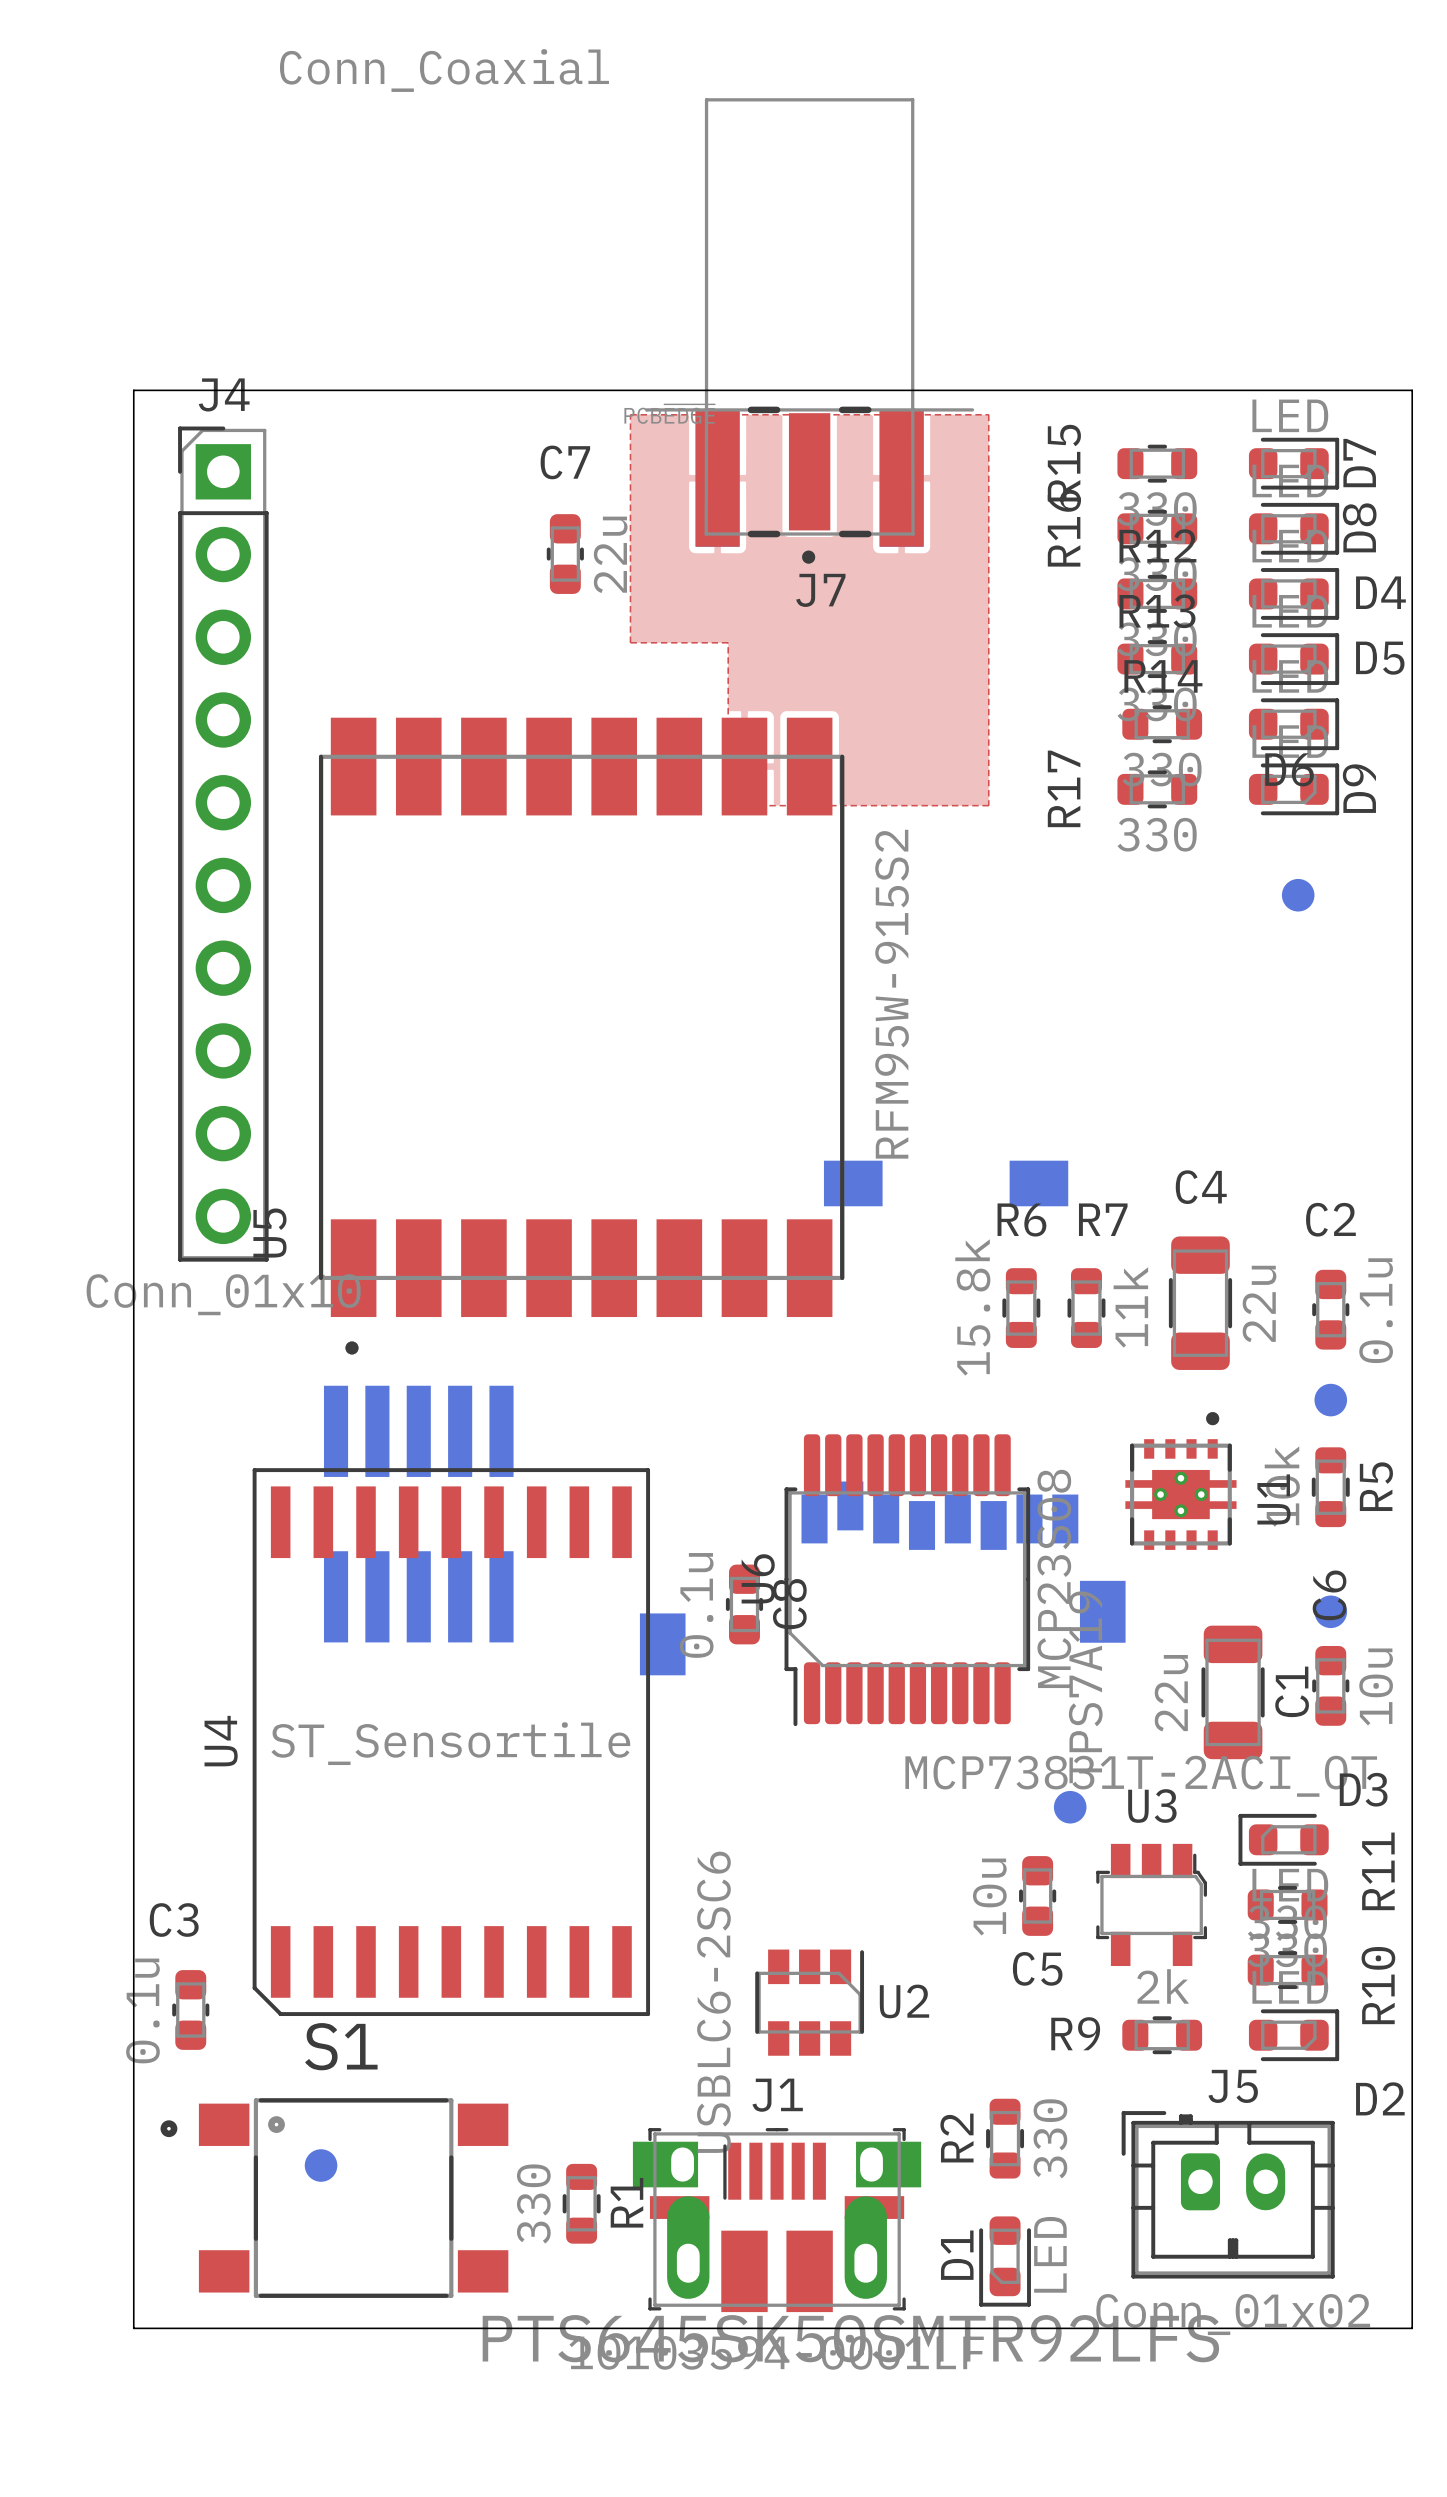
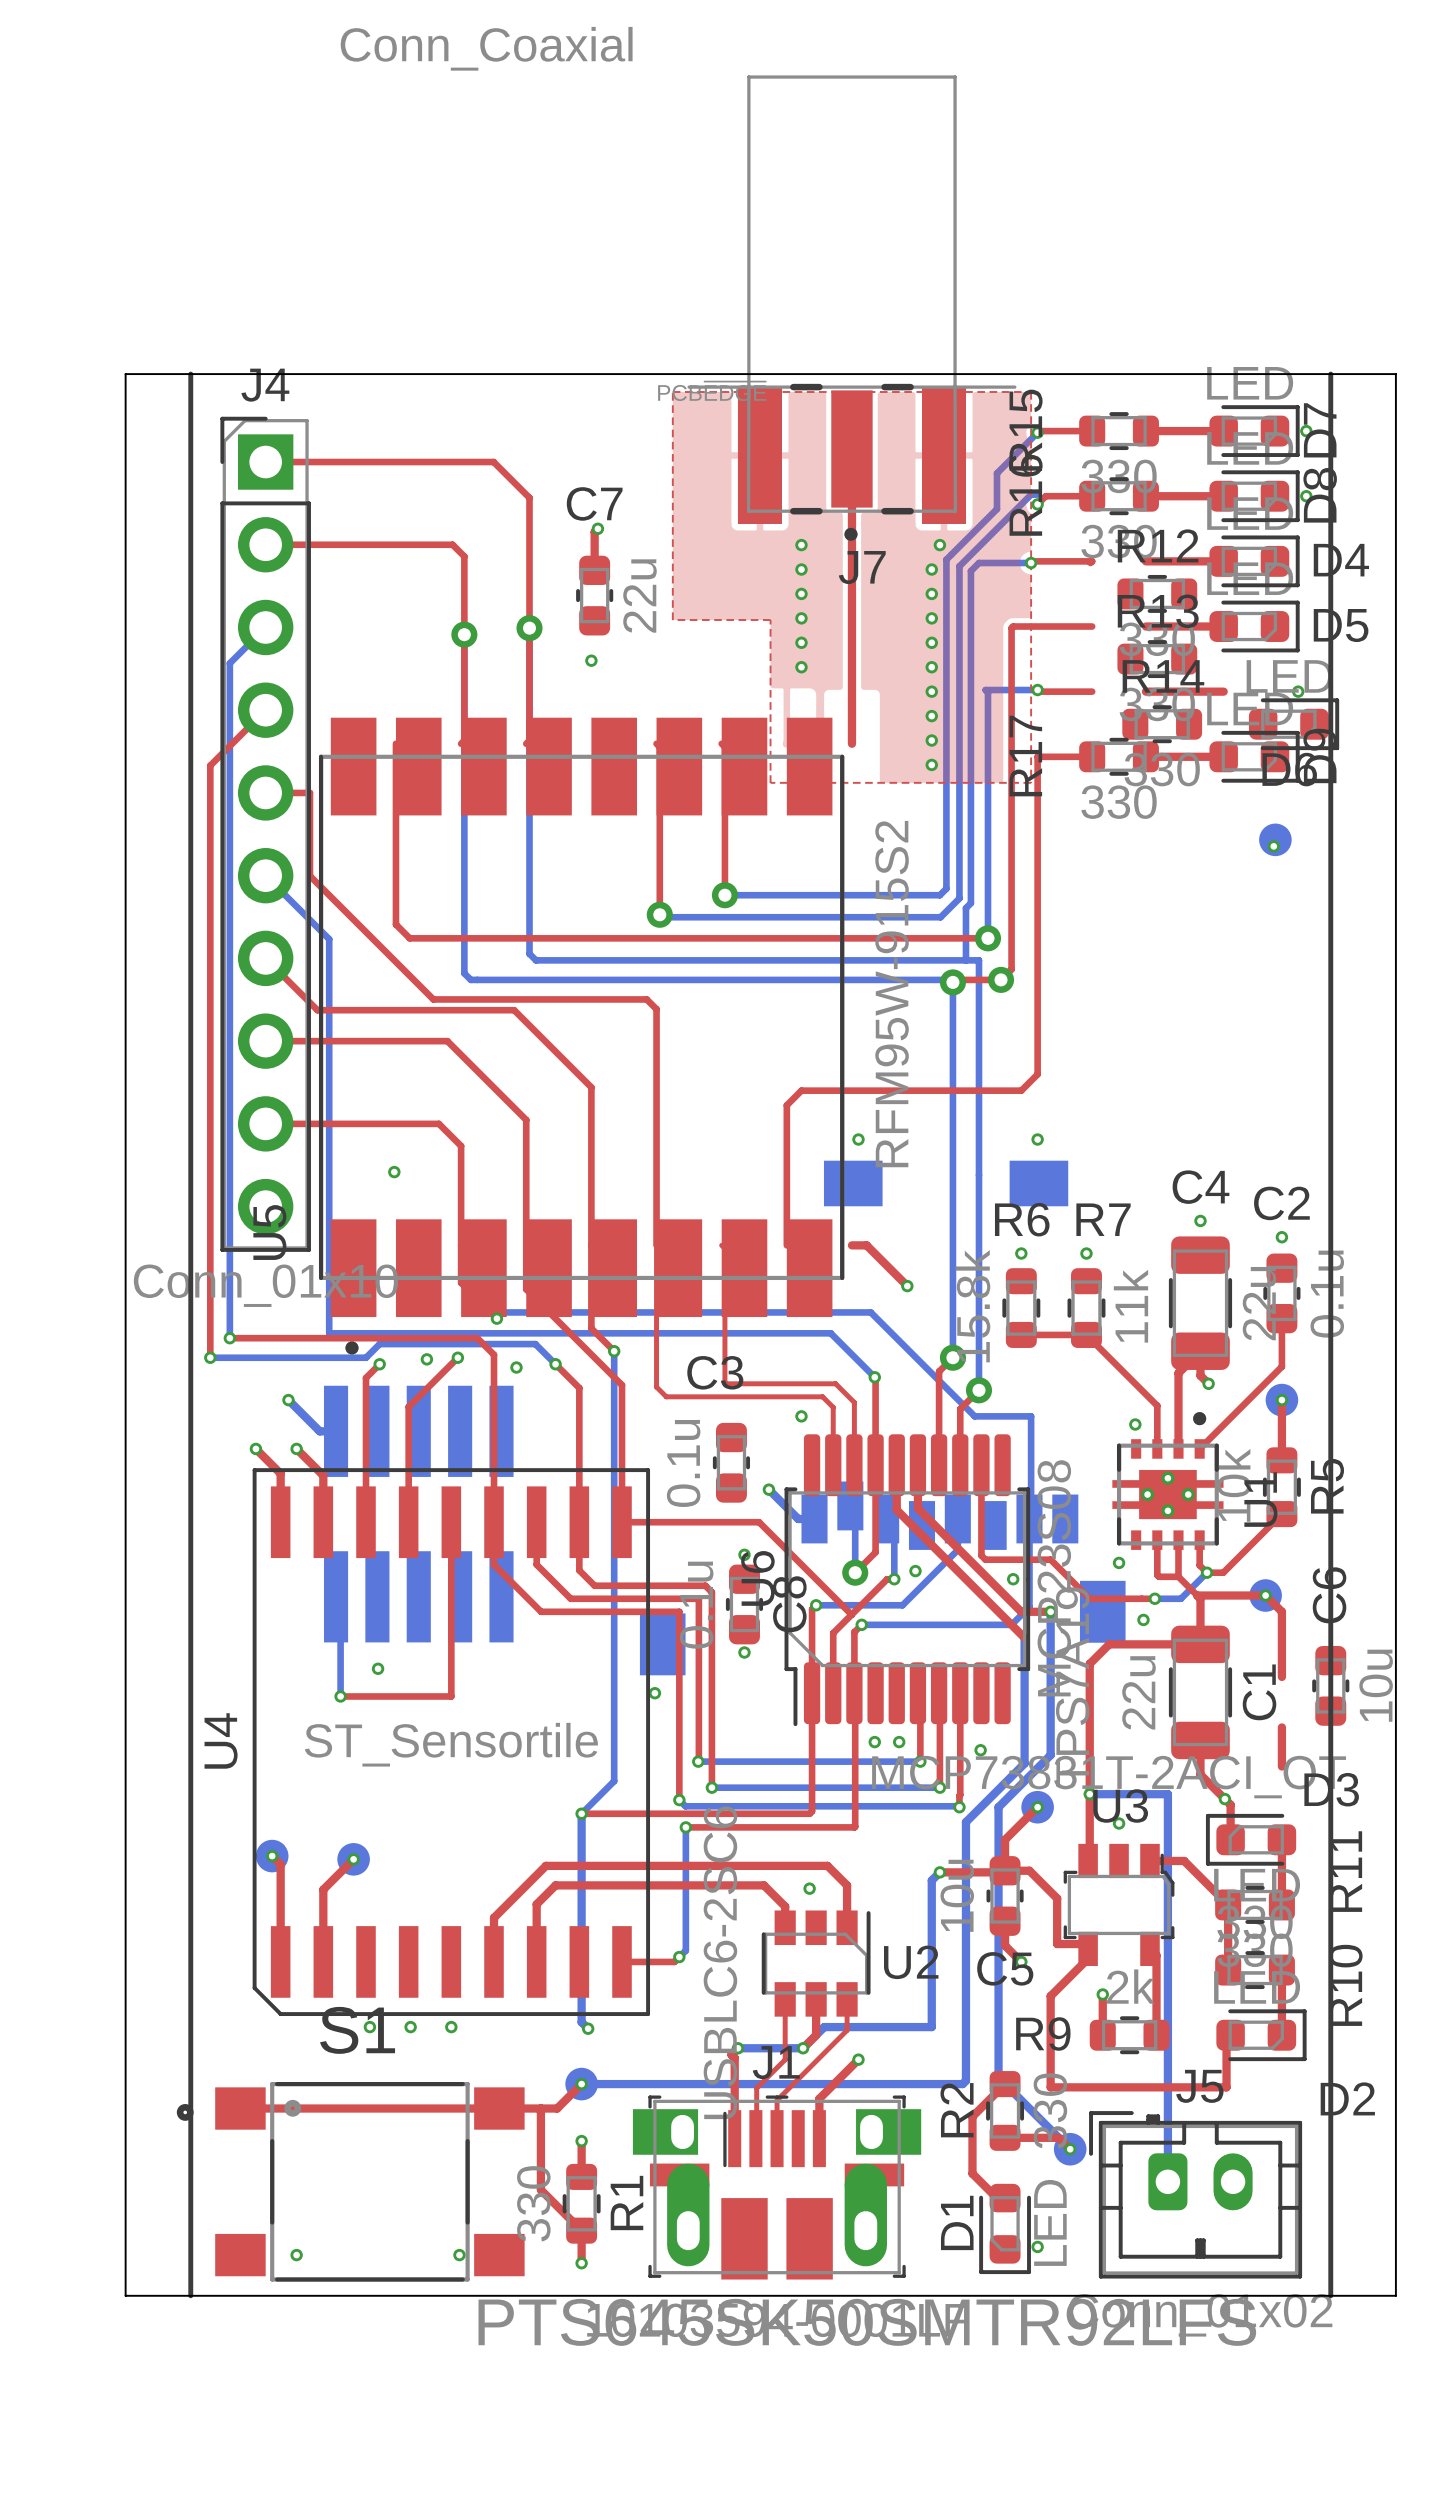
J7 position: (809, 330) -> (851, 308)
line: none -> (190, 374) (190, 2295)
line: none -> (1330, 374) (1330, 2295)
board edge: (133, 390) (133, 2328) (1412, 2328) (1412, 390) (133, 390) -> (125, 374) (125, 2295) (1395, 2295) (1395, 374) (125, 374)
top zone outline: (630, 414) (630, 642) (728, 642) (728, 805) (988, 805) (988, 414) (630, 414) -> (672, 391) (672, 619) (770, 619) (770, 782) (1031, 782) (1031, 391) (672, 391)
top track: none -> (1092, 431) (1039, 431) (1037, 432)
top track: none -> (1145, 431) (1223, 431)
via: none -> (1306, 431)
bottom track: none -> (1037, 432) (996, 473) (996, 509) (946, 559) (946, 888) (939, 895) (724, 895)
via: none -> (1037, 432)
top track: none -> (851, 448) (851, 743)
top track: none -> (265, 462) (493, 462) (529, 497) (529, 740) (526, 743)
R15 position: (1157, 463) -> (1119, 431)
D7 position: (1294, 463) -> (1254, 431)
bottom track: none -> (1037, 494) (1031, 494) (959, 566) (959, 898) (940, 917) (662, 917) (659, 914)
top track: none -> (1092, 496) (1045, 496) (1037, 504)
top track: none -> (1145, 496) (1223, 496)
via: none -> (1306, 496)
via: none -> (1037, 504)
top track: none -> (597, 528) (594, 532) (594, 570)
via: none -> (597, 528)
R16 position: (1157, 528) -> (1119, 496)
D8 position: (1294, 528) -> (1254, 496)
top track: none -> (265, 544) (452, 544) (464, 556) (464, 740) (461, 743)
via: none -> (801, 545)
via: none -> (939, 545)
C7 position: (565, 554) -> (594, 595)
top track: none -> (1145, 561) (1223, 561)
top track: none -> (1031, 562) (1032, 561) (1092, 561) (1090, 562)
bottom track: none -> (1031, 562) (978, 562) (970, 571) (970, 903) (965, 908) (965, 960)
via: none -> (1031, 562)
via: none -> (801, 569)
via: none -> (931, 569)
via: none -> (801, 593)
via: none -> (931, 593)
D4 position: (1294, 593) -> (1254, 561)
via: none -> (801, 618)
via: none -> (931, 618)
top track: none -> (1092, 626) (1013, 626) (1011, 628) (1011, 969) (1001, 979) (955, 979) (952, 982)
top track: none -> (1145, 626) (1223, 626)
bottom track: none -> (265, 627) (229, 663) (229, 1338)
bottom track: none -> (529, 628) (529, 953) (536, 960) (978, 960) (978, 1390)
via: none -> (529, 628)
bottom track: none -> (464, 634) (464, 973) (470, 979) (952, 979) (952, 1357)
via: none -> (464, 634)
via: none -> (801, 642)
via: none -> (931, 642)
D5 position: (1294, 659) -> (1254, 626)
via: none -> (591, 660)
via: none -> (801, 667)
via: none -> (931, 667)
top track: none -> (1037, 690) (1039, 691) (1092, 691)
bottom track: none -> (1037, 690) (985, 690) (987, 692) (987, 938)
via: none -> (1037, 690)
via: none -> (931, 691)
top track: none -> (1145, 691) (1223, 691)
via: none -> (1298, 691)
top track: none -> (265, 710) (210, 765) (210, 1357)
via: none -> (931, 716)
via: none -> (931, 740)
top track: none -> (395, 743) (395, 924) (409, 938) (987, 938)
top track: none -> (656, 743) (659, 747) (659, 914)
top track: none -> (721, 743) (724, 747) (724, 895)
top track: none -> (1092, 756) (1037, 756) (1037, 1074) (1021, 1090) (801, 1090) (786, 1105) (786, 1245)
top track: none -> (1145, 756) (1223, 756)
via: none -> (931, 764)
R17 position: (1157, 789) -> (1119, 756)
D9 position: (1294, 789) -> (1254, 756)
top track: none -> (265, 792) (309, 792) (309, 876) (433, 999) (646, 999) (656, 1009) (656, 1387) (666, 1396) (822, 1396) (833, 1407) (833, 1465)
J4 position: (223, 844) -> (265, 834)
via: none -> (1273, 846)
bottom track: none -> (265, 875) (329, 939) (329, 1333) (830, 1333) (874, 1377)
via: none -> (724, 895)
part position: (1298, 895) -> (1275, 839)
via: none -> (659, 914)
via: none -> (987, 938)
top track: none -> (265, 958) (317, 1010) (514, 1010) (591, 1087) (591, 1328) (614, 1351)
via: none -> (1001, 979)
via: none -> (952, 982)
top track: none -> (265, 1041) (447, 1041) (526, 1119) (526, 1289) (622, 1385) (622, 1522) (759, 1522) (851, 1614)
top track: none -> (265, 1123) (438, 1123) (461, 1146) (461, 1282) (496, 1318)
via: none -> (858, 1139)
via: none -> (1037, 1139)
via: none -> (394, 1172)
via: none -> (1200, 1220)
via: none -> (1281, 1237)
top track: none -> (721, 1245) (724, 1248) (724, 1383) (835, 1383) (854, 1402) (854, 1465)
top track: none -> (851, 1245) (866, 1245) (907, 1286)
via: none -> (1021, 1253)
via: none -> (1086, 1253)
via: none -> (907, 1286)
C2 position: (1330, 1309) -> (1281, 1293)
bottom track: none -> (496, 1318) (503, 1312) (870, 1312) (974, 1416) (1031, 1416) (1029, 1606) (1011, 1624) (861, 1624)
via: none -> (496, 1318)
top track: none -> (1281, 1318) (1281, 1366) (1199, 1448)
top track: none -> (1021, 1334) (1086, 1334) (1157, 1405) (1157, 1448)
top track: none -> (229, 1338) (477, 1338) (494, 1354) (494, 1564) (541, 1611) (679, 1611) (679, 1800)
via: none -> (229, 1338)
bottom track: none -> (614, 1351) (614, 1781) (581, 1813) (581, 2022) (588, 2028)
via: none -> (614, 1351)
bottom track: none -> (210, 1357) (366, 1357) (379, 1344) (535, 1344) (555, 1364)
via: none -> (210, 1357)
top track: none -> (457, 1357) (408, 1406) (408, 1522)
via: none -> (457, 1357)
top track: none -> (952, 1357) (939, 1371) (939, 1465)
via: none -> (952, 1357)
via: none -> (426, 1359)
top track: none -> (379, 1364) (366, 1377) (366, 1522)
via: none -> (379, 1364)
top track: none -> (555, 1364) (579, 1388) (579, 1570) (594, 1585) (705, 1585) (711, 1592) (711, 1787)
via: none -> (555, 1364)
via: none -> (516, 1367)
top track: none -> (874, 1377) (875, 1552) (855, 1572)
via: none -> (874, 1377)
top track: none -> (1208, 1383) (1200, 1375) (1200, 1351) (1178, 1373) (1178, 1448)
via: none -> (1208, 1383)
via: none -> (978, 1390)
top track: none -> (981, 1392) (978, 1390) (960, 1409) (960, 1465)
bottom track: none -> (288, 1400) (319, 1431) (336, 1431)
via: none -> (288, 1400)
top track: none -> (1281, 1400) (1281, 1460)
via: none -> (1281, 1400)
part position: (1330, 1400) -> (1281, 1400)
via: none -> (801, 1416)
via: none -> (1135, 1424)
top track: none -> (255, 1448) (280, 1473) (280, 1522)
via: none -> (255, 1448)
top track: none -> (296, 1448) (323, 1475) (323, 1522)
via: none -> (296, 1448)
top track: none -> (896, 1465) (896, 1510) (1024, 1637)
top track: none -> (917, 1465) (917, 1508) (1021, 1611) (1050, 1611)
top track: none -> (981, 1465) (981, 1555) (985, 1559) (1050, 1559) (1089, 1598) (1154, 1598)
U1 position: (1180, 1481) -> (1167, 1481)
R5 position: (1330, 1487) -> (1281, 1487)
bottom track: none -> (768, 1489) (798, 1518) (814, 1518)
via: none -> (768, 1489)
bottom track: none -> (850, 1505) (855, 1510) (855, 1572)
top track: none -> (1281, 1514) (1223, 1572) (1206, 1572) (1199, 1565) (1199, 1540)
bottom track: none -> (886, 1518) (894, 1527) (894, 1579)
bottom track: none -> (957, 1518) (957, 1550) (902, 1605) (816, 1605)
top track: none -> (451, 1522) (451, 1696) (340, 1696)
top track: none -> (536, 1522) (536, 1564) (570, 1598) (698, 1598) (698, 1761)
top track: none -> (1157, 1540) (1157, 1575) (1178, 1576)
top track: none -> (1178, 1540) (1178, 1576)
via: none -> (744, 1554)
via: none -> (1119, 1562)
via: none -> (915, 1571)
via: none -> (855, 1572)
bottom track: none -> (1206, 1572) (1180, 1598) (1154, 1598)
via: none -> (1206, 1572)
top track: none -> (1178, 1576) (1197, 1595)
top track: none -> (894, 1579) (887, 1579) (833, 1633) (833, 1693)
via: none -> (894, 1579)
via: none -> (1013, 1579)
top track: none -> (1197, 1595) (1265, 1595) (1281, 1611) (1281, 1676)
top track: none -> (1197, 1595) (1200, 1598) (1200, 1644) (1109, 1644) (1089, 1663) (1089, 1859) (1088, 1860)
via: none -> (1265, 1595)
bottom track: none -> (336, 1596) (340, 1601) (340, 1696)
via: none -> (1154, 1598)
top track: none -> (816, 1605) (812, 1609) (812, 1811) (809, 1813) (581, 1813)
via: none -> (816, 1605)
bottom track: none -> (1050, 1611) (1050, 1755) (998, 1807) (998, 2077) (1070, 2149)
via: none -> (1050, 1611)
part position: (1330, 1611) -> (1265, 1595)
via: none -> (1143, 1619)
top track: none -> (861, 1624) (854, 1632) (855, 1826) (685, 1827)
via: none -> (861, 1624)
bottom track: none -> (1024, 1637) (1024, 1763) (965, 1822) (965, 2080) (962, 2084) (581, 2084)
via: none -> (744, 1652)
via: none -> (378, 1668)
C1 position: (1233, 1692) -> (1200, 1692)
via: none -> (654, 1693)
top track: none -> (917, 1693) (920, 1695) (920, 1761)
top track: none -> (939, 1693) (939, 1787)
top track: none -> (960, 1693) (959, 1807)
via: none -> (340, 1696)
top track: none -> (1281, 1727) (1281, 1766)
top track: none -> (1200, 1740) (1200, 1774) (1230, 1804) (1230, 1839)
via: none -> (874, 1742)
via: none -> (899, 1742)
via: none -> (980, 1750)
bottom track: none -> (698, 1761) (920, 1761)
via: none -> (698, 1761)
via: none -> (920, 1761)
bottom track: none -> (711, 1787) (939, 1787)
via: none -> (711, 1787)
via: none -> (939, 1787)
bottom track: none -> (1089, 1794) (1167, 1794) (1167, 2185)
via: none -> (1089, 1794)
via: none -> (1224, 1799)
bottom track: none -> (679, 1800) (685, 1806) (960, 1806)
via: none -> (679, 1800)
via: none -> (959, 1807)
top track: none -> (1037, 1807) (1005, 1839) (1005, 1870)
via: none -> (1037, 1807)
part position: (1070, 1807) -> (1037, 1807)
via: none -> (581, 1813)
via: none -> (1119, 1823)
bottom track: none -> (685, 1827) (685, 1950) (679, 1957)
via: none -> (685, 1827)
top track: none -> (1281, 1839) (1281, 1904)
D3 position: (1283, 1839) -> (1251, 1839)
top track: none -> (272, 1856) (280, 1864) (280, 1961)
part: none -> (272, 1856)
via: none -> (272, 1856)
top track: none -> (353, 1859) (323, 1889) (323, 1961)
part: none -> (353, 1859)
via: none -> (353, 1859)
top track: none -> (1149, 1860) (1184, 1860) (1228, 1904) (1228, 1970)
top track: none -> (1005, 1870) (1029, 1870) (1057, 1898) (1057, 1944) (1083, 1944) (1088, 1948) (1088, 1958) (1050, 1996) (1050, 2087) (1226, 2087) (1226, 2039) (1230, 2035)
top track: none -> (1005, 1870) (1003, 1872) (939, 1872)
bottom track: none -> (939, 1872) (931, 1880) (931, 2027) (824, 2027) (803, 2048) (737, 2048)
via: none -> (939, 1872)
via: none -> (809, 1888)
C5 position: (1037, 1895) -> (1005, 1895)
U3 position: (1151, 1904) -> (1119, 1904)
R11 position: (1287, 1904) -> (1255, 1904)
top track: none -> (1005, 1921) (1005, 1945) (1021, 1961)
top track: none -> (785, 1927) (785, 1906) (764, 1885) (555, 1885) (536, 1904) (536, 1961)
top track: none -> (847, 1927) (847, 1885) (827, 1865) (545, 1865) (494, 1917) (494, 1961)
top track: none -> (1149, 1948) (1156, 1955) (1156, 2035)
top track: none -> (679, 1957) (674, 1961) (622, 1961)
via: none -> (679, 1957)
via: none -> (1021, 1961)
top track: none -> (1281, 1970) (1281, 2035)
R10 position: (1287, 1970) -> (1255, 1970)
top track: none -> (1102, 1994) (1102, 2035)
via: none -> (1102, 1994)
top track: none -> (785, 1999) (785, 2059) (756, 2088) (755, 2138)
top track: none -> (816, 1999) (816, 2035) (803, 2048)
top track: none -> (847, 1999) (847, 2030) (777, 2100) (777, 2138)
U2 position: (809, 2002) -> (816, 1963)
C3 position: (190, 2009) -> (731, 1462)
via: none -> (369, 2027)
via: none -> (410, 2027)
via: none -> (451, 2027)
via: none -> (588, 2028)
R9 position: (1162, 2035) -> (1129, 2035)
D2 position: (1294, 2035) -> (1261, 2035)
top track: none -> (737, 2048) (731, 2054) (734, 2058) (734, 2138)
via: none -> (737, 2048)
via: none -> (803, 2048)
top track: none -> (858, 2059) (819, 2098) (819, 2138)
via: none -> (858, 2059)
top track: none -> (581, 2084) (557, 2108) (240, 2108)
part: none -> (581, 2084)
via: none -> (581, 2084)
top track: none -> (1005, 2084) (972, 2116) (972, 2173) (996, 2198) (1005, 2198)
top track: none -> (540, 2108) (540, 2189) (581, 2230) (581, 2263)
top track: none -> (1005, 2137) (1058, 2137) (1070, 2149)
R2 position: (1005, 2138) -> (1005, 2110)
top track: none -> (581, 2141) (581, 2176)
via: none -> (581, 2141)
part: none -> (1070, 2149)
via: none -> (1070, 2149)
part: (321, 2165) -> none
J5 position: (1228, 2194) -> (1195, 2194)
S1 position: (334, 2198) -> (350, 2181)
J1 position: (777, 2220) -> (777, 2187)
via: none -> (1037, 2246)
via: none -> (296, 2255)
via: none -> (459, 2255)
D1 position: (1005, 2261) -> (1005, 2228)
via: none -> (581, 2263)

